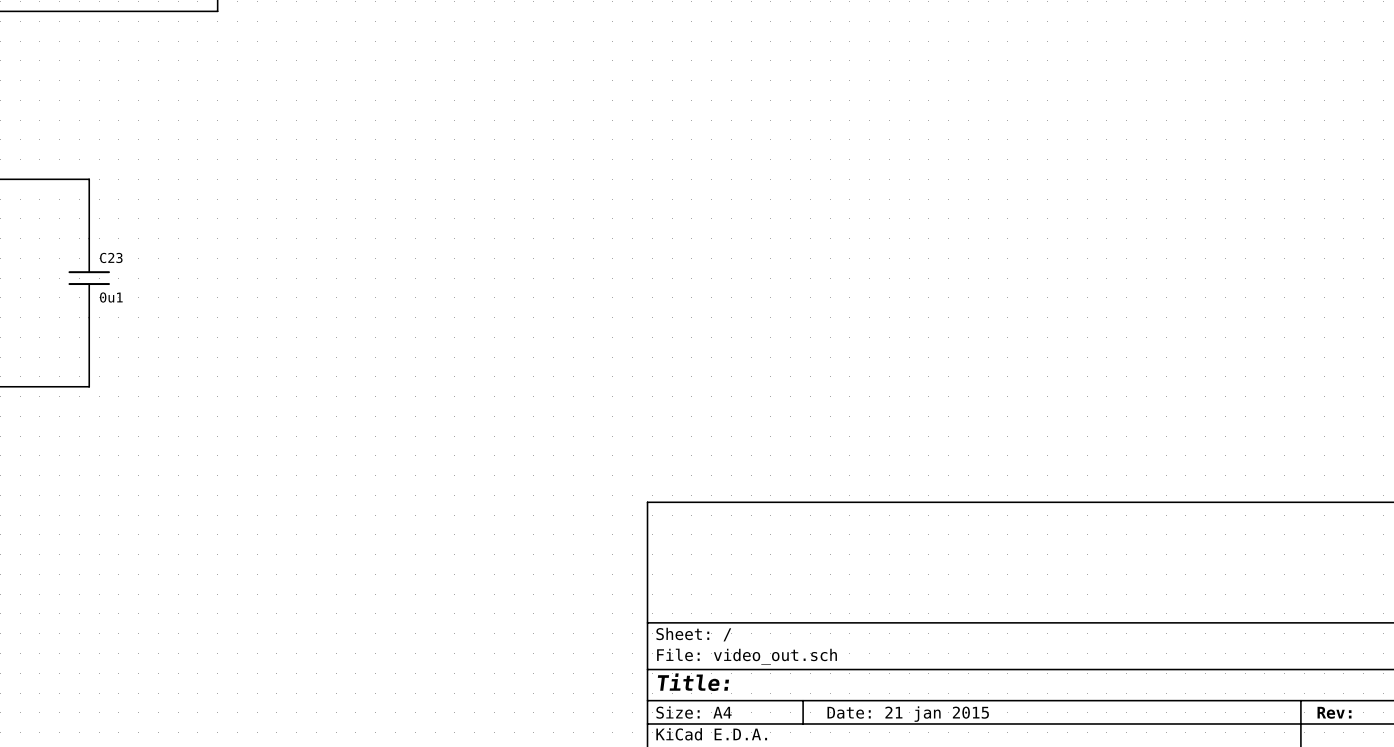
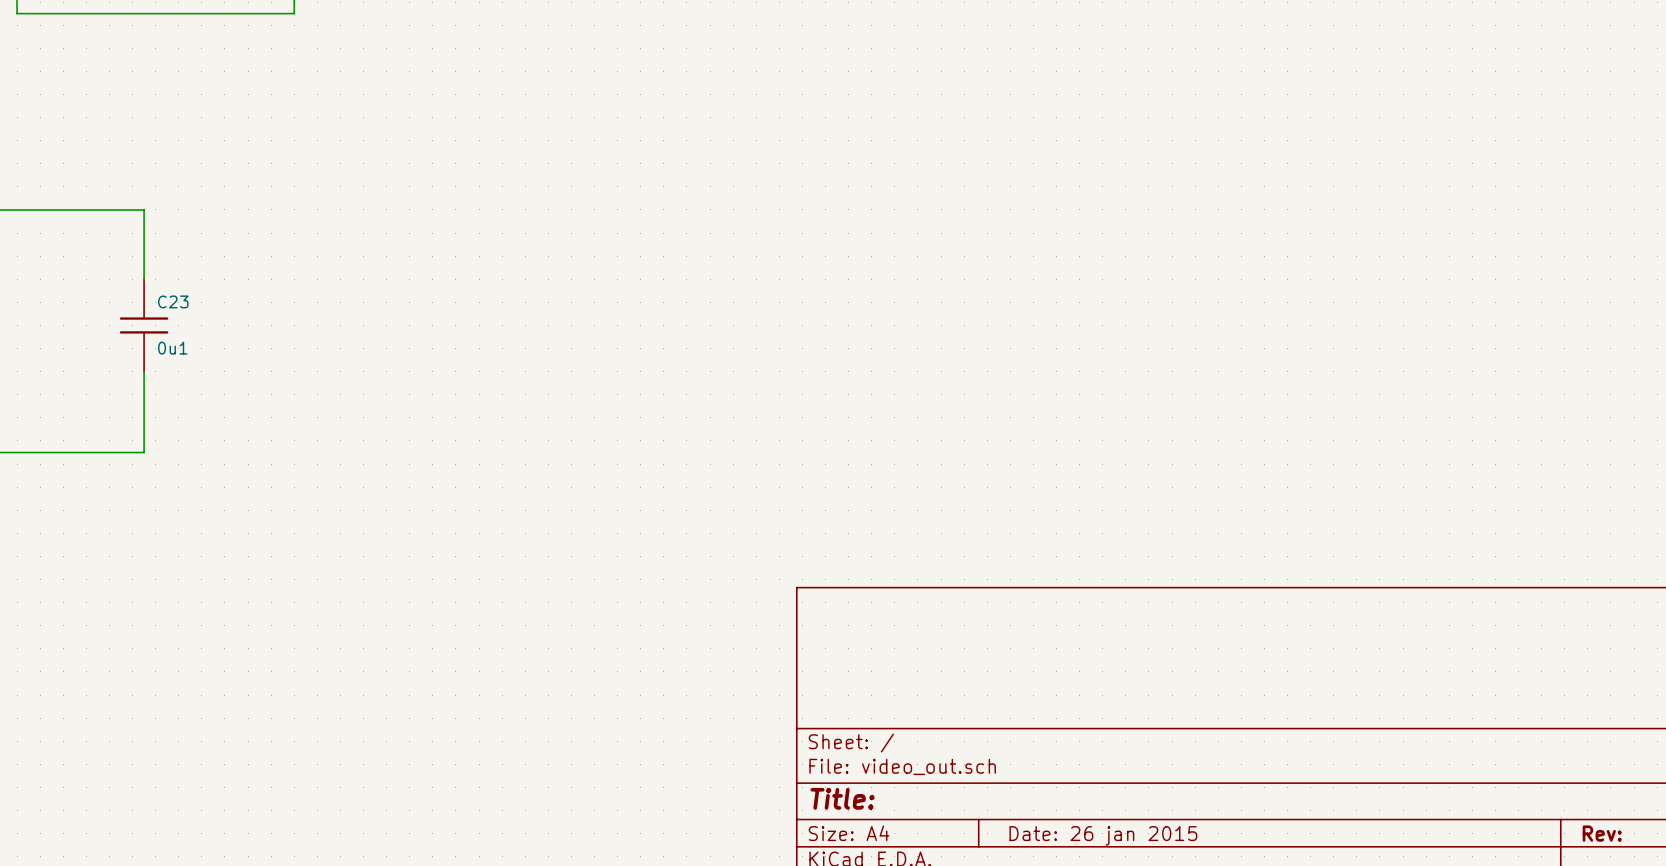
title block: Date: 21 jan 2015 (908, 714) -> Date: 26 jan 2015 (1103, 835)

